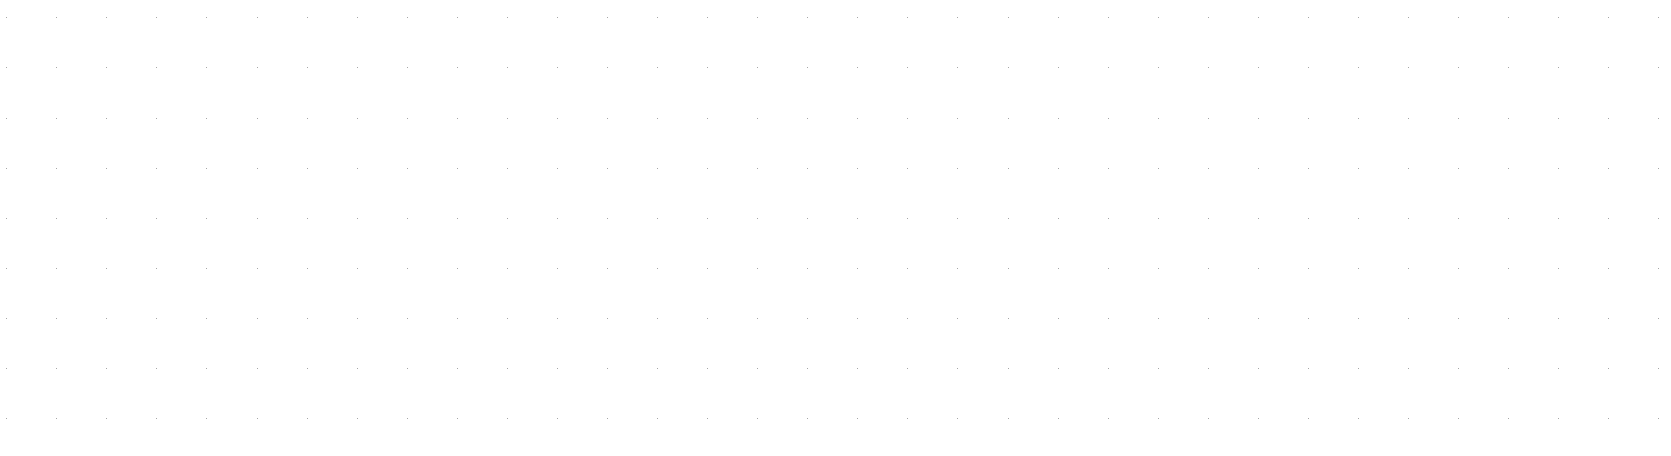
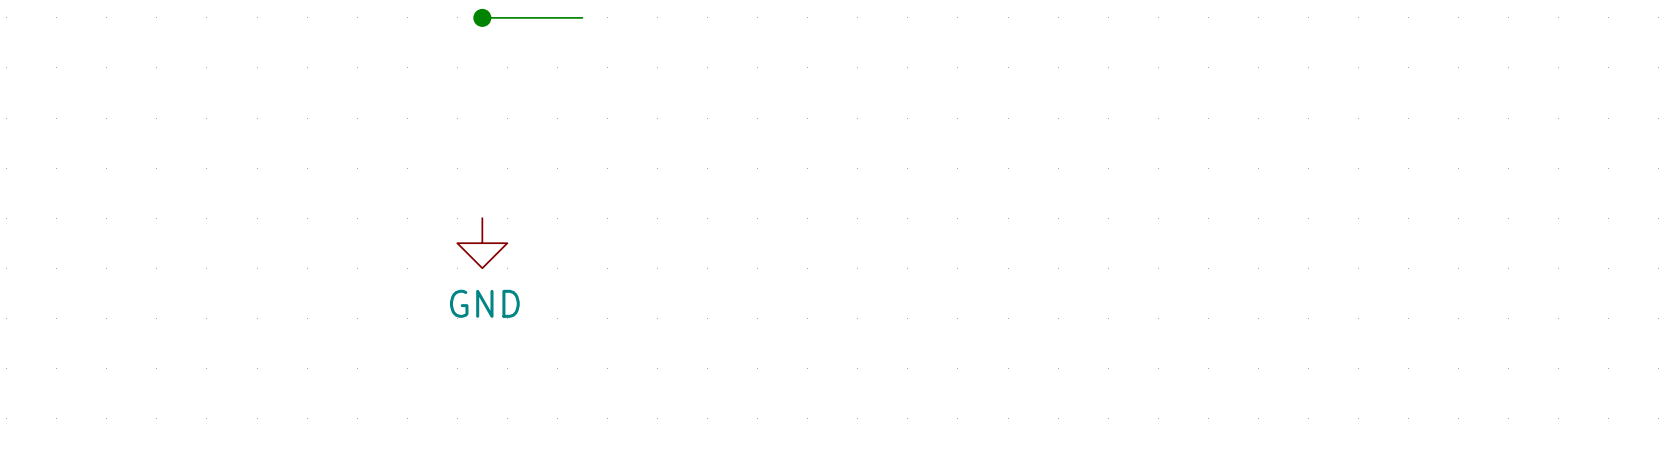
wire: none -> (482, 17) (582, 17)
junction: none -> (482, 17)
power symbol: none -> GND (482, 243)

